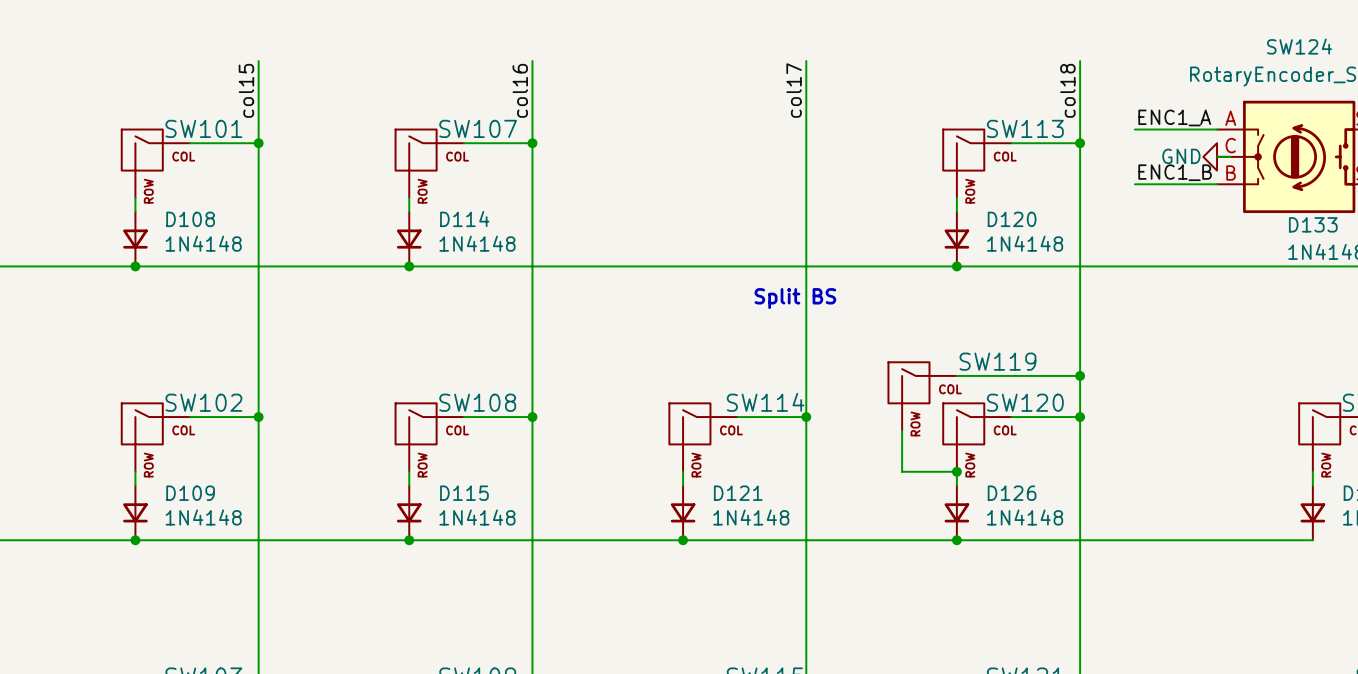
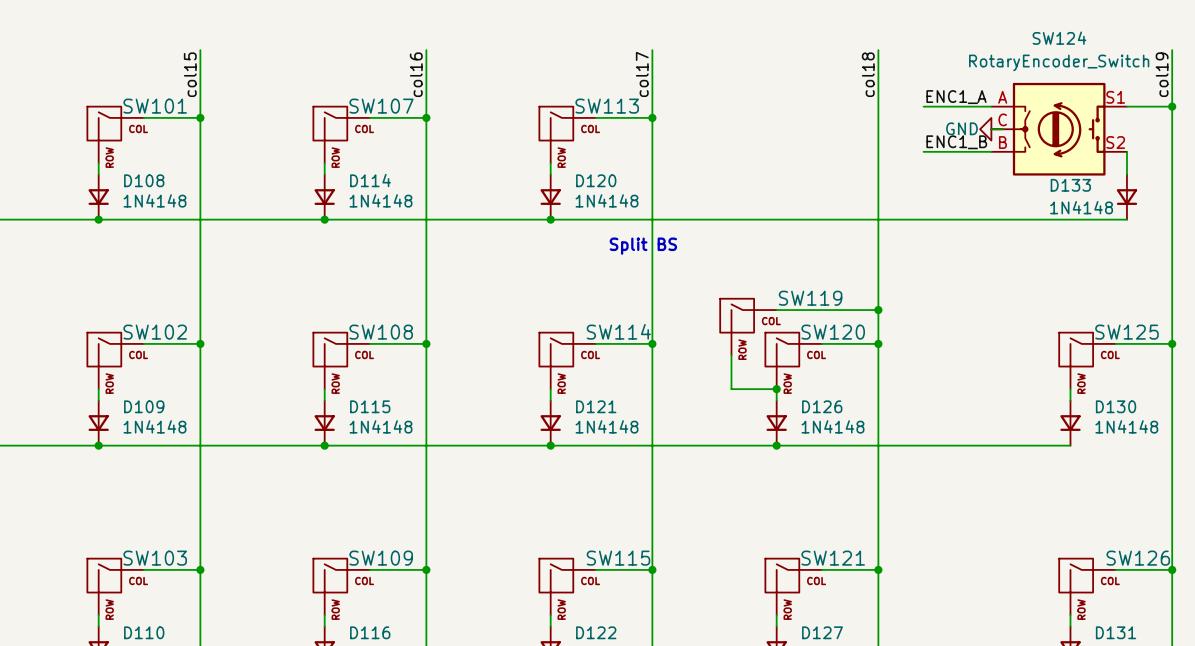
wire: none -> (595, 117) (652, 117)
junction: none -> (652, 117)
wire: (1011, 143) (1080, 143) -> none
junction: (1080, 143) -> none
SW113 position: (977, 163) -> (567, 134)
wire: none -> (550, 163) (550, 174)
wire: (956, 197) (956, 211) -> none
D120 position: (956, 239) -> (550, 197)
junction: none -> (550, 219)
junction: (956, 266) -> none

